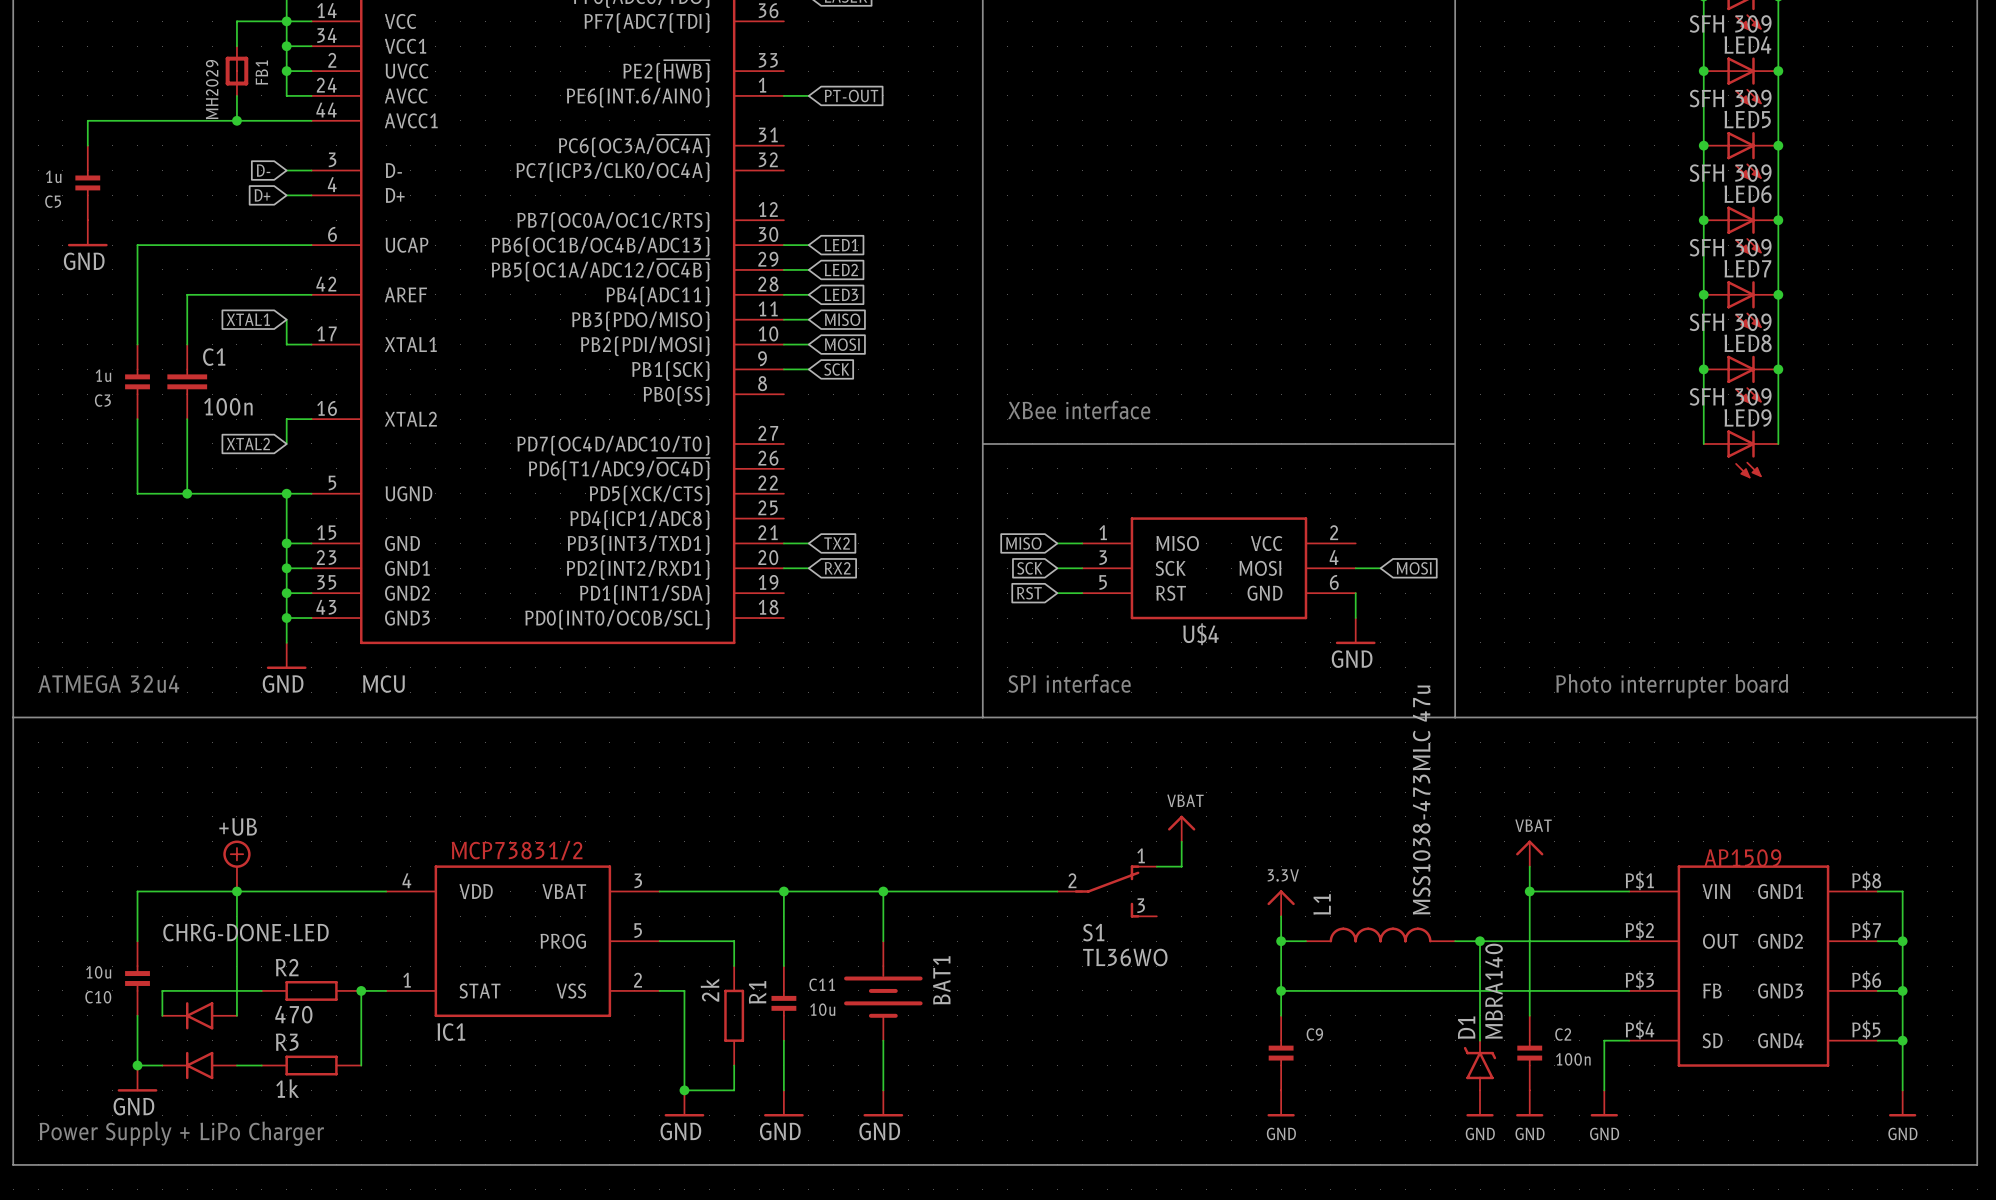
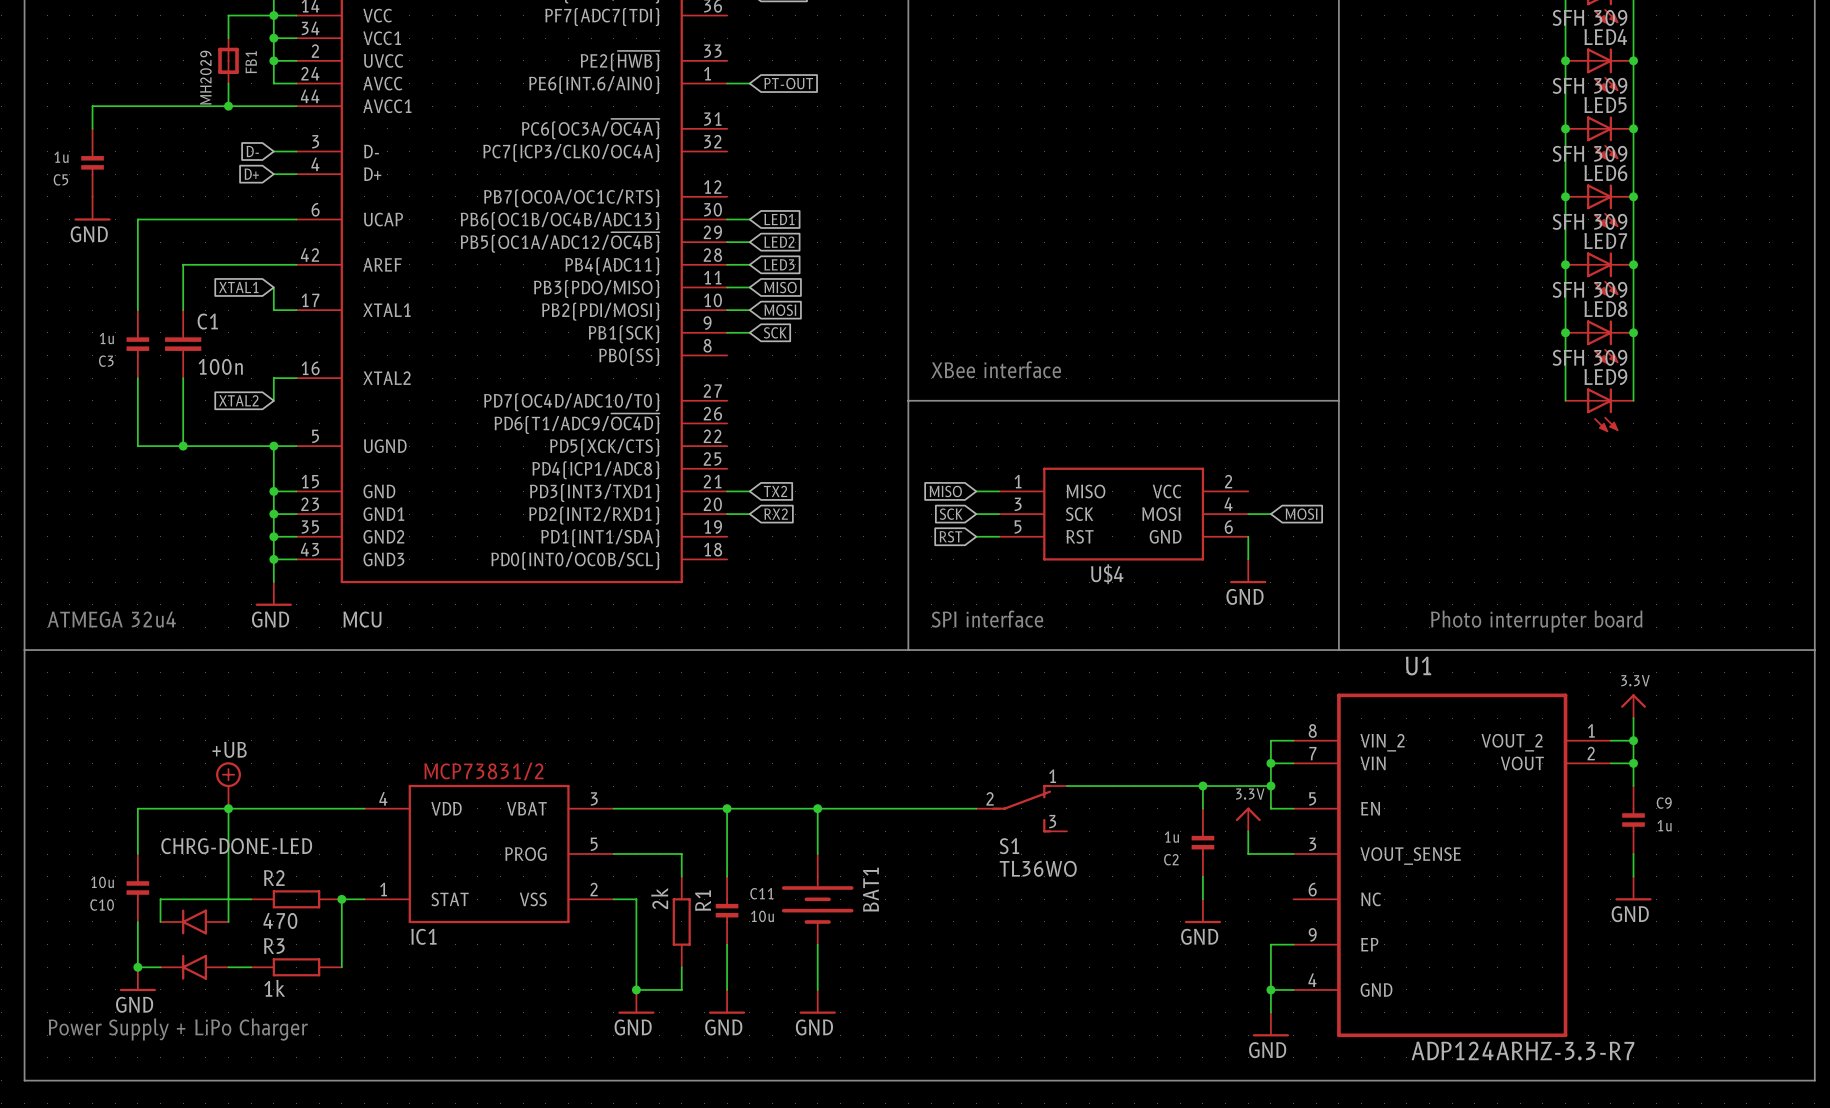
power symbol: none -> 3.3V (1633, 706)
wire: none -> (1633, 718) (1633, 786)
wire: none -> (1293, 740) (1270, 740) (1270, 808) (1293, 808)
junction: none -> (1633, 740)
power symbol: VBAT (1181, 828) -> none
wire: (1181, 841) (1181, 866) -> (1270, 786) (1089, 786)
junction: none -> (1270, 763)
junction: none -> (1633, 763)
power symbol: VBAT (1529, 853) -> none
wire: none -> (1202, 786) (1202, 808)
junction: none -> (1202, 786)
junction: none -> (1270, 786)
wire: (1529, 866) (1529, 1015) -> none
wire: (1529, 891) (1629, 891) -> none
junction: (1529, 891) -> none
wire: (1877, 891) (1902, 891) (1902, 1090) -> none
power symbol position: 3.3V (1281, 903) -> 3.3V (1248, 819)
C9 value: none -> 1u (1664, 825)
wire: (1281, 916) (1281, 1015) -> none
wire: none -> (1248, 831) (1248, 854) (1293, 854)
L1: MSS1038-473MLC 47u (1380, 935) -> none
wire: (1281, 941) (1305, 941) -> (1270, 763) (1293, 763)
junction: (1281, 941) -> none
wire: (1455, 941) (1629, 941) -> none
wire: (1480, 941) (1480, 1040) -> none
junction: (1480, 941) -> none
wire: none -> (1633, 854) (1633, 876)
wire: (1877, 941) (1902, 941) -> (1610, 763) (1633, 763)
junction: (1902, 941) -> none
U1: none -> ADP124ARHZ-3.3-R7 (1452, 865)
wire: none -> (1202, 876) (1202, 899)
part: (1753, 966) -> none
power symbol: none -> GND (1633, 888)
wire: (1281, 990) (1629, 990) -> none
junction: (1281, 990) -> none
wire: (1877, 990) (1902, 990) -> (1610, 740) (1633, 740)
junction: (1902, 990) -> none
power symbol: none -> GND (1202, 911)
C2 name position: C2 (1563, 1034) -> C2 (1171, 859)
wire: none -> (1293, 944) (1270, 944) (1270, 1012)
wire: (1629, 1040) (1604, 1040) (1604, 1090) -> none
wire: (1877, 1040) (1902, 1040) -> none
junction: (1902, 1040) -> none
C9 position: (1281, 1053) -> (1633, 820)
C2 position: (1529, 1053) -> (1202, 842)
C2 value: 100n (1573, 1059) -> 1u (1171, 837)
D1: MBRA140 (1480, 1065) -> none
wire: none -> (1270, 989) (1293, 989)
junction: none -> (1270, 989)
power symbol: GND (1281, 1103) -> none
power symbol: GND (1480, 1103) -> none
power symbol: GND (1529, 1103) -> none
power symbol: GND (1604, 1103) -> none
power symbol: GND (1902, 1103) -> none
power symbol: none -> GND (1270, 1024)
line: (13, 1164) (1977, 1164) -> (24, 1057) (24, 1080) (1814, 1080) (1814, 1057)

